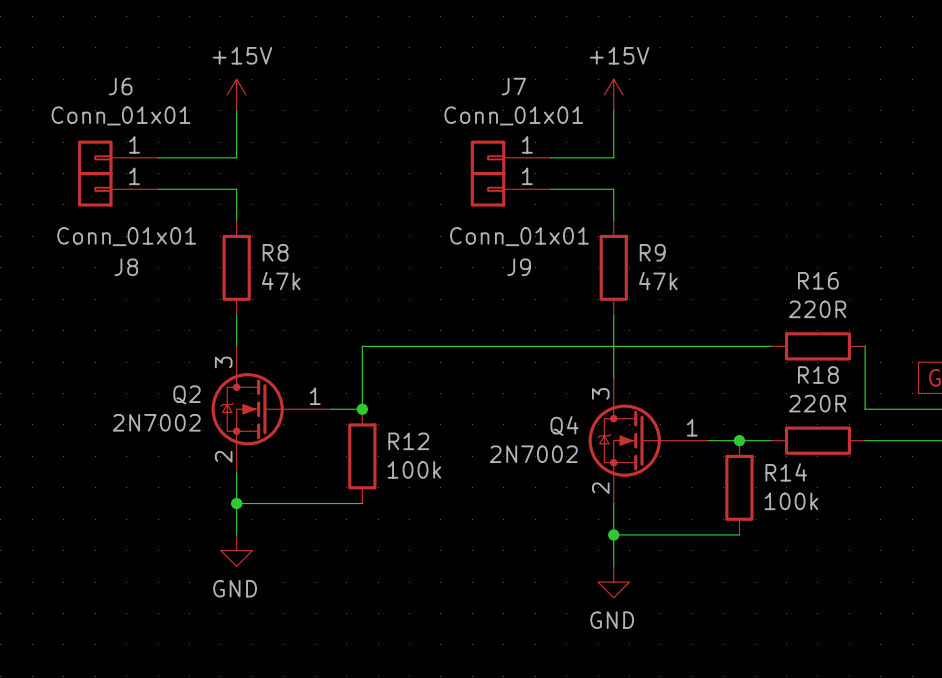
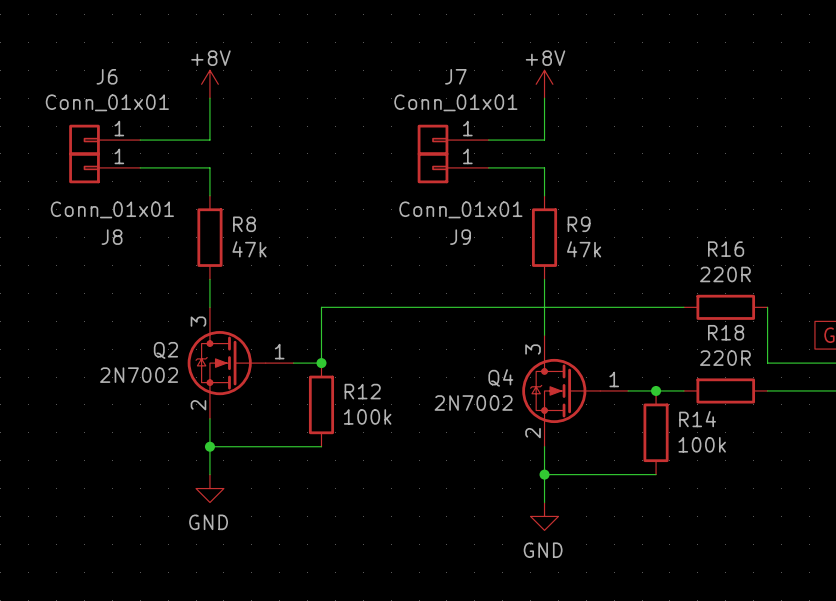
power symbol: +15V (236, 95) -> +8V (209, 84)
power symbol: +15V (613, 95) -> +8V (544, 84)

